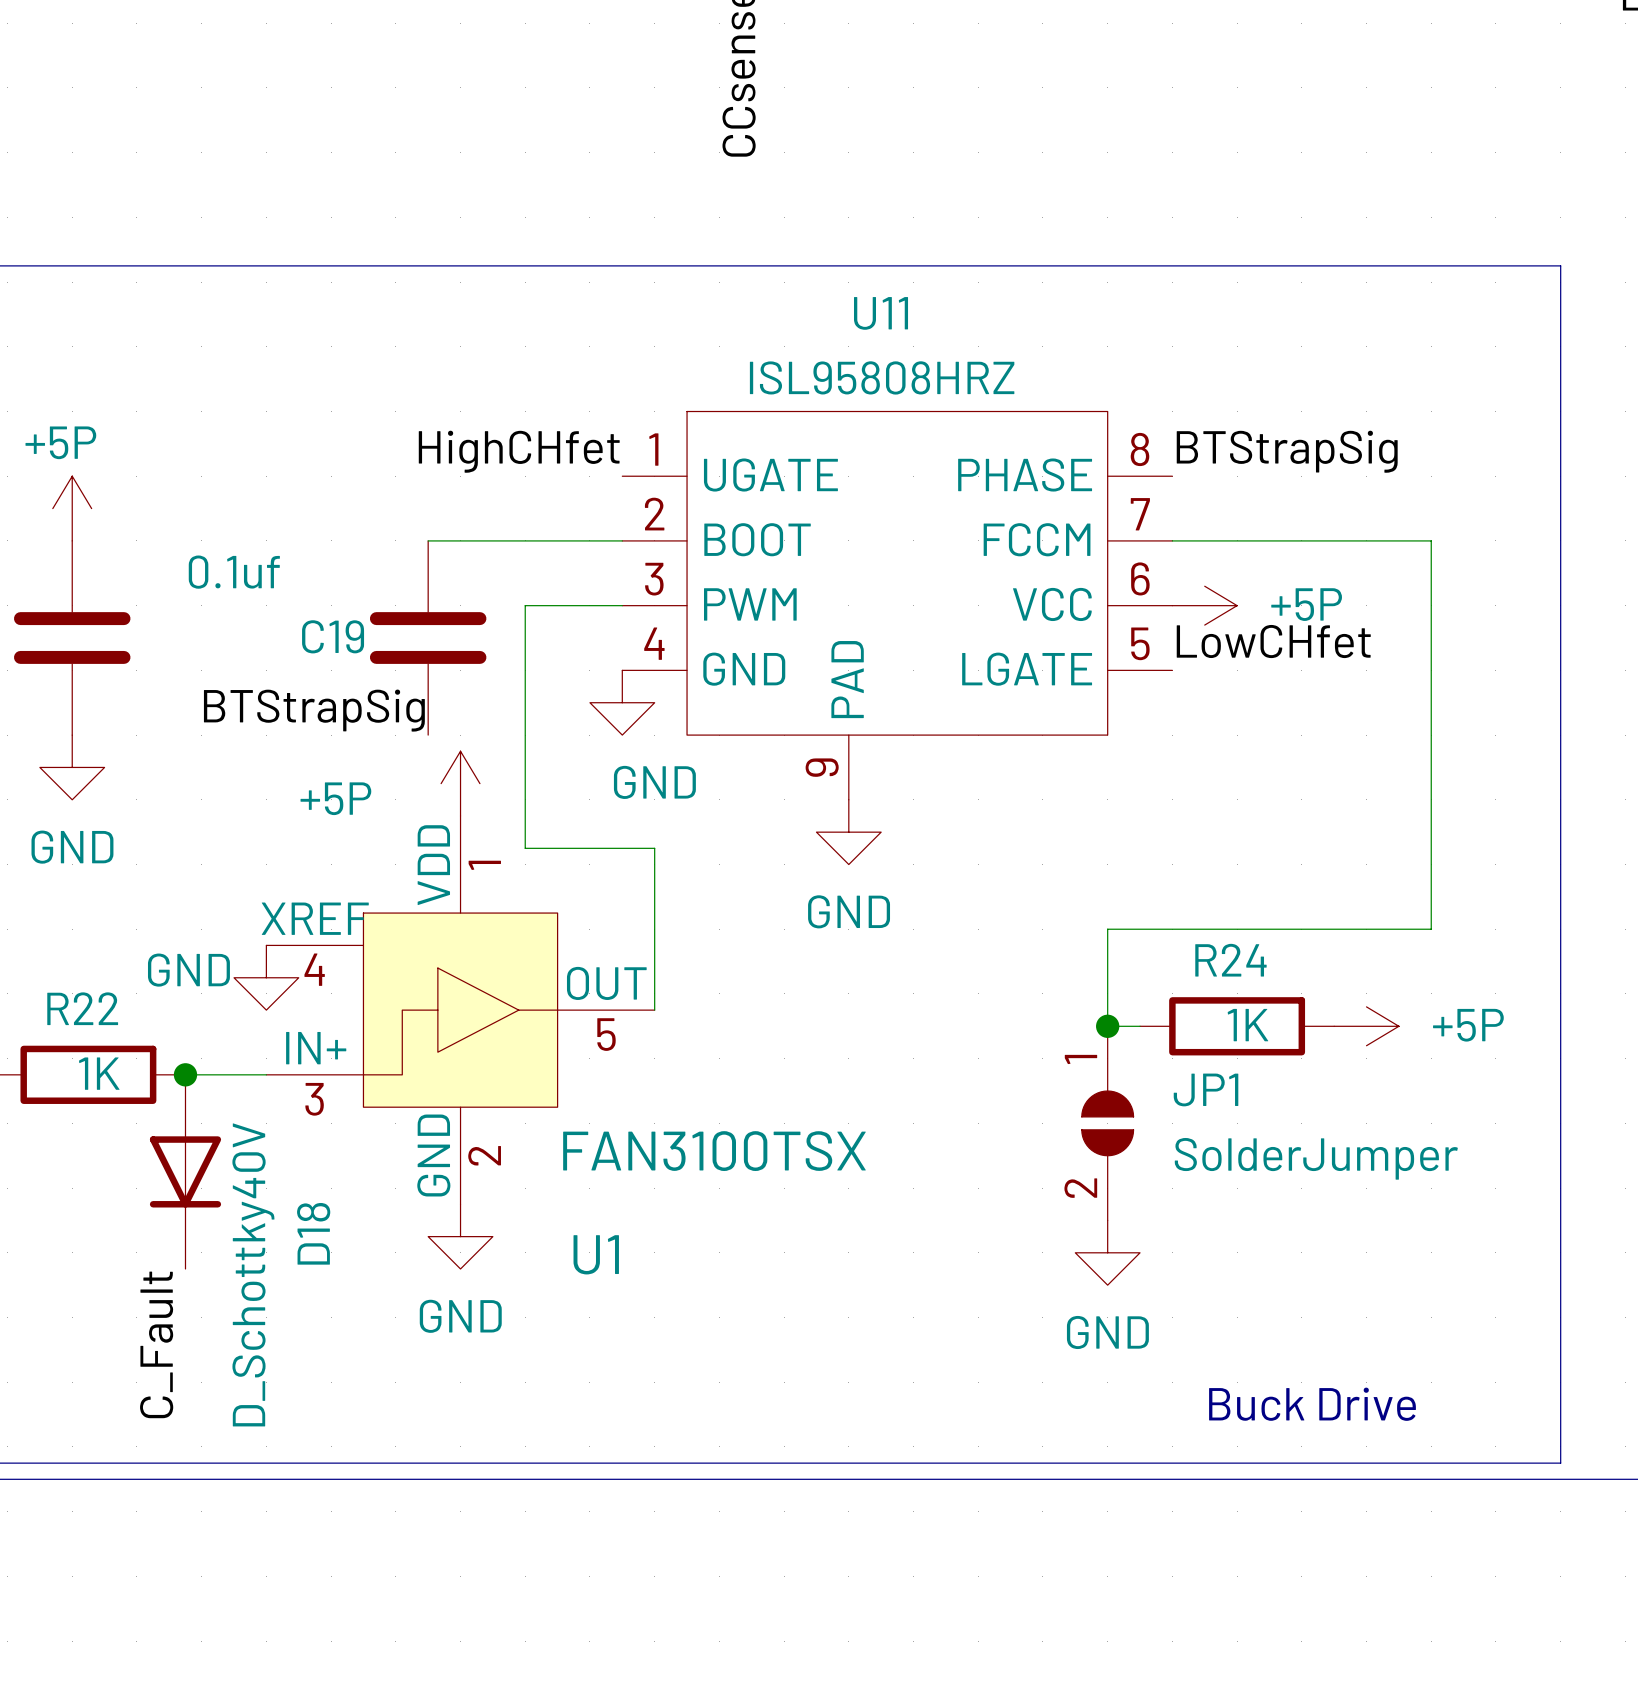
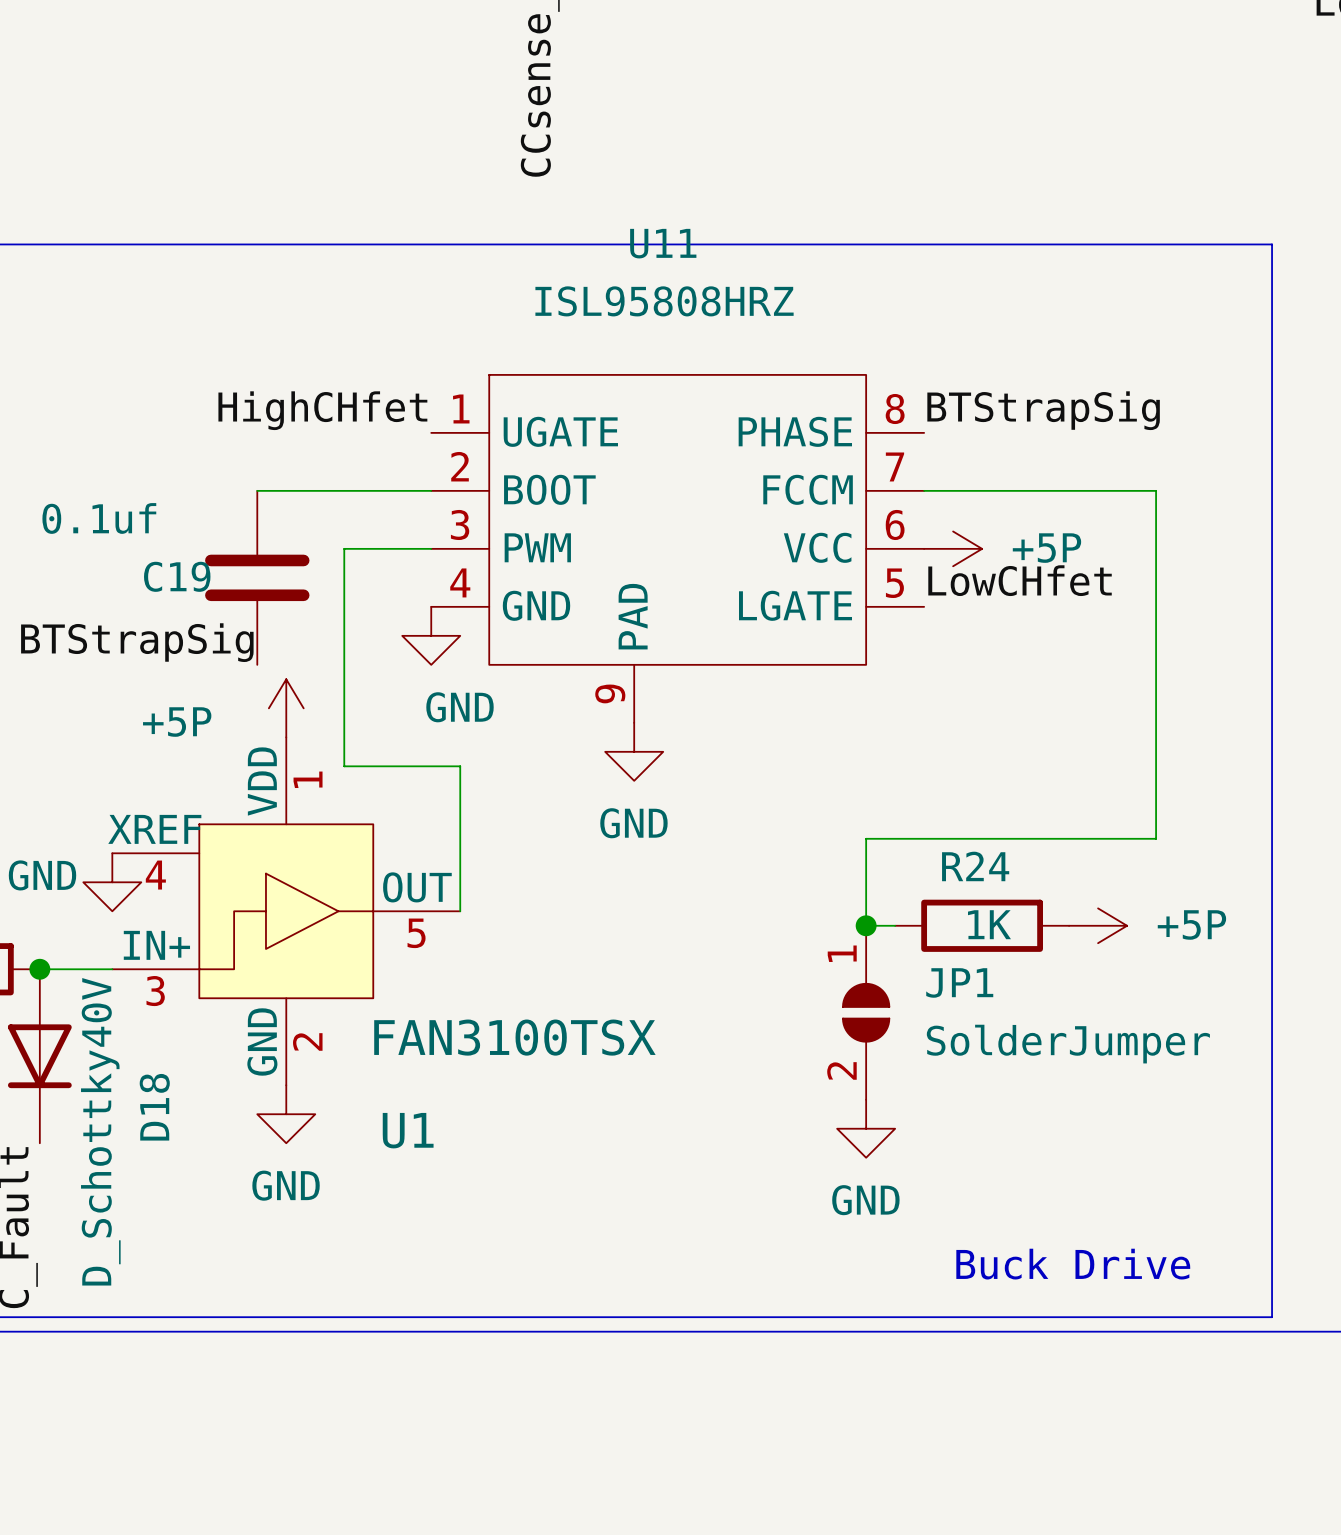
U11 name position: U11 (881, 313) -> U11 (663, 243)
U11 value position: ISL95808HRZ (882, 377) -> ISL95808HRZ (664, 301)

